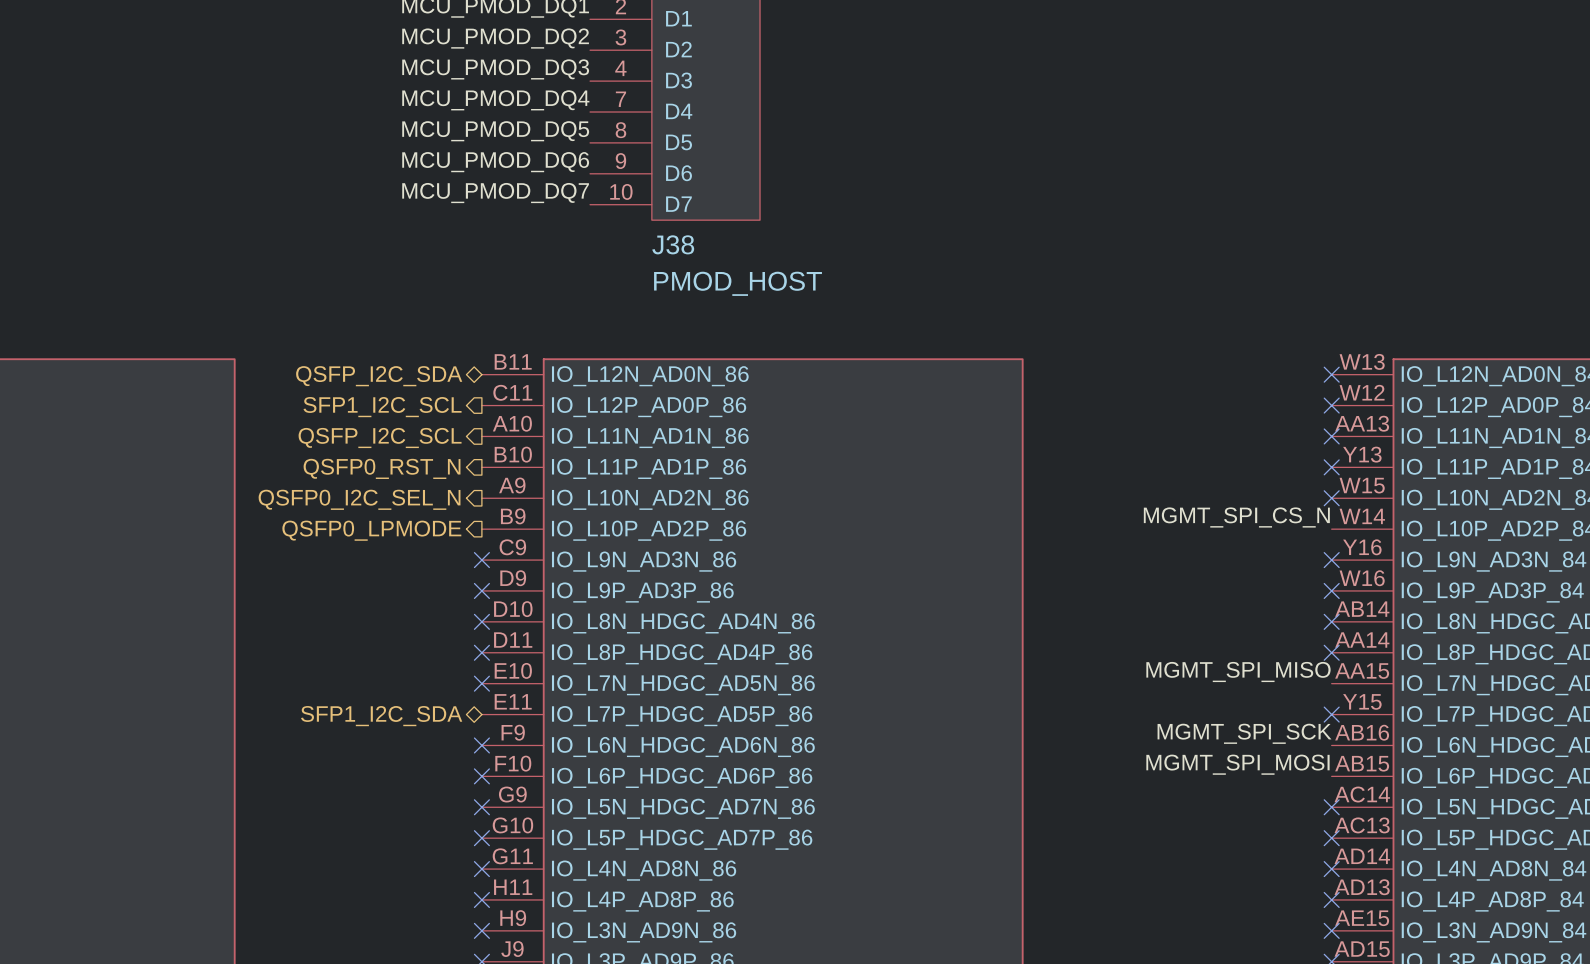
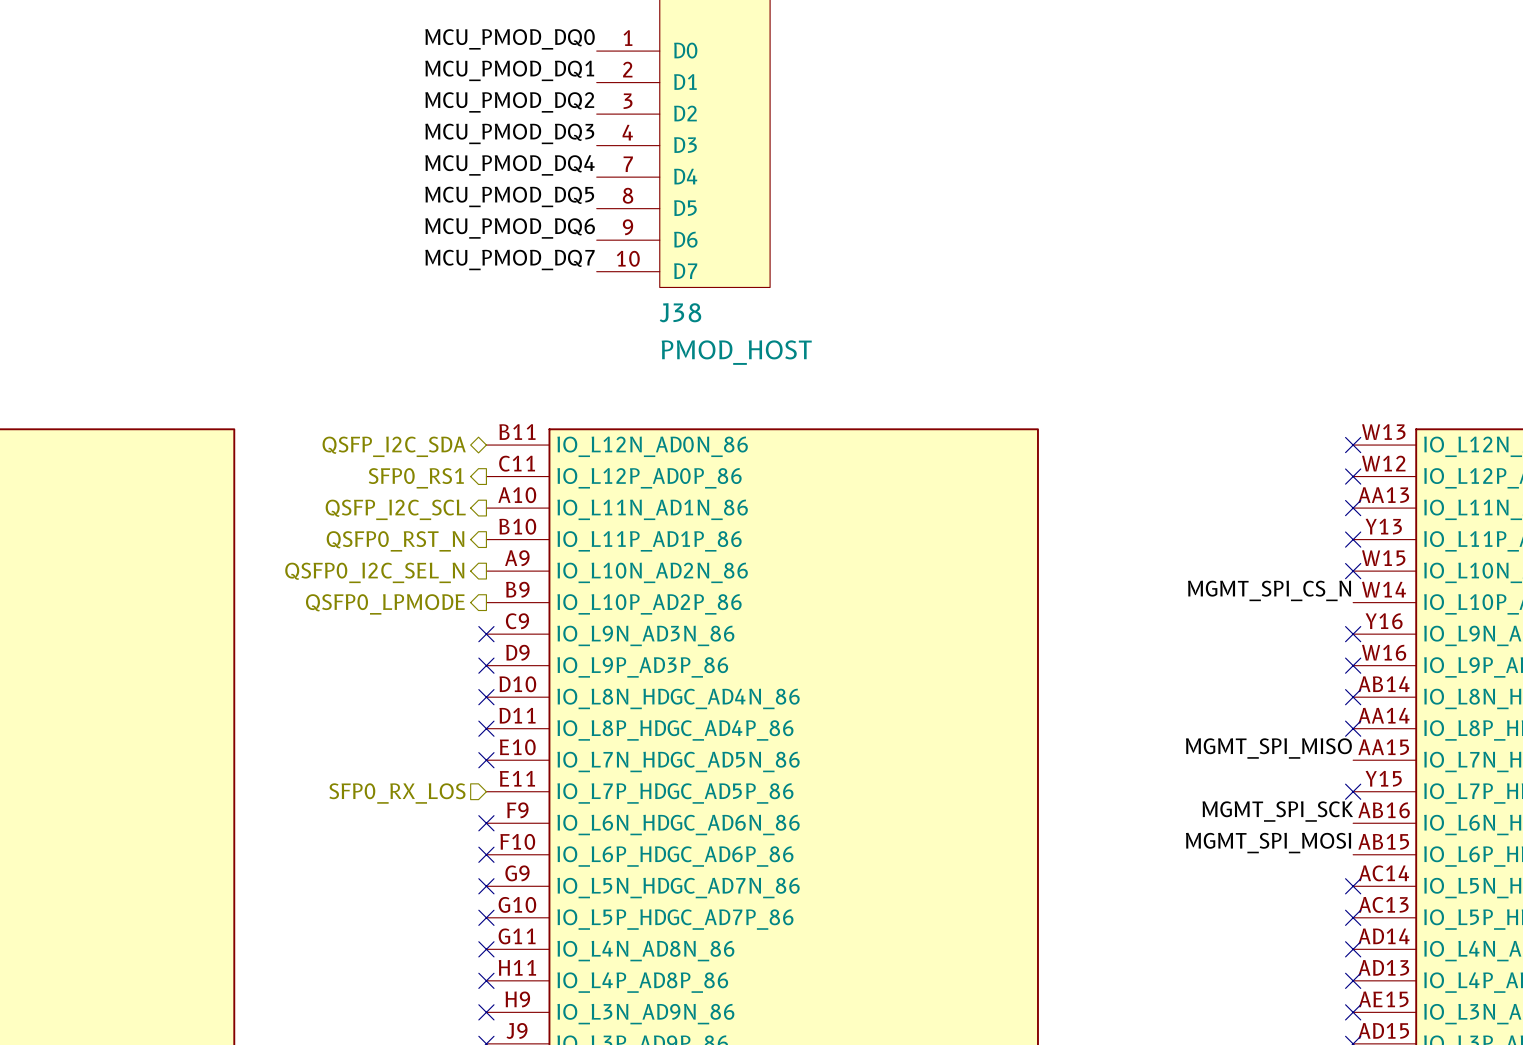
hierarchical label: SFP1_I2C_SCL (382, 407) -> SFP0_RS1 (416, 478)
hierarchical label shape: bidirectional (381, 716) -> input (397, 793)
hierarchical label: SFP1_I2C_SDA (381, 716) -> SFP0_RX_LOS (397, 793)

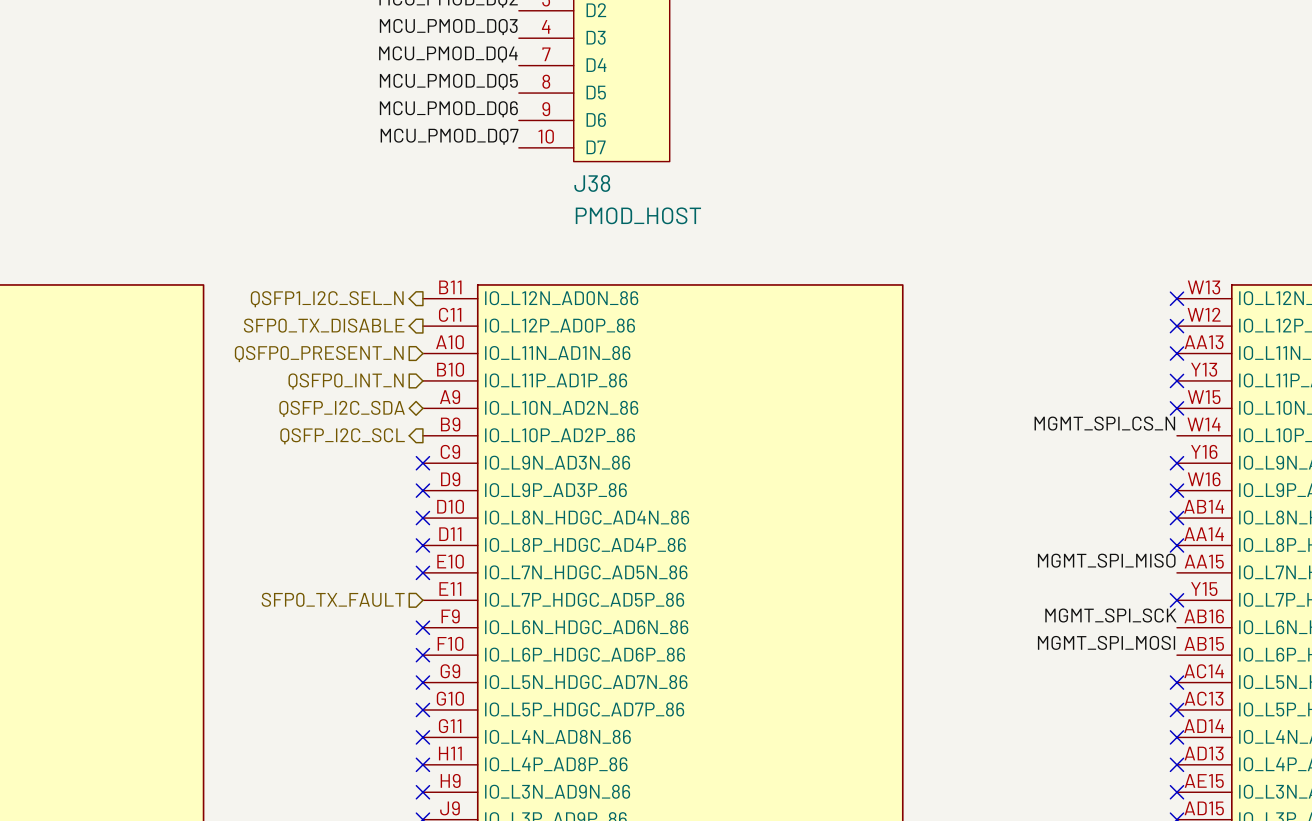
hierarchical label shape: bidirectional (394, 446) -> output (327, 299)
hierarchical label: QSFP_I2C_SDA (394, 446) -> QSFP1_I2C_SEL_N (327, 299)
hierarchical label: SFP0_RS1 (416, 478) -> SFP0_TX_DISABLE (324, 325)
hierarchical label shape: output (395, 509) -> input (319, 354)
hierarchical label: QSFP_I2C_SCL (395, 509) -> QSFP0_PRESENT_N (319, 354)
hierarchical label shape: output (395, 541) -> input (346, 381)
hierarchical label: QSFP0_RST_N (395, 541) -> QSFP0_INT_N (346, 381)
hierarchical label shape: output (374, 572) -> bidirectional (342, 408)
hierarchical label: QSFP0_I2C_SEL_N (374, 572) -> QSFP_I2C_SDA (342, 408)
hierarchical label: QSFP0_LPMODE (385, 604) -> QSFP_I2C_SCL (342, 436)
hierarchical label: SFP0_RX_LOS (397, 793) -> SFP0_TX_FAULT (333, 599)

